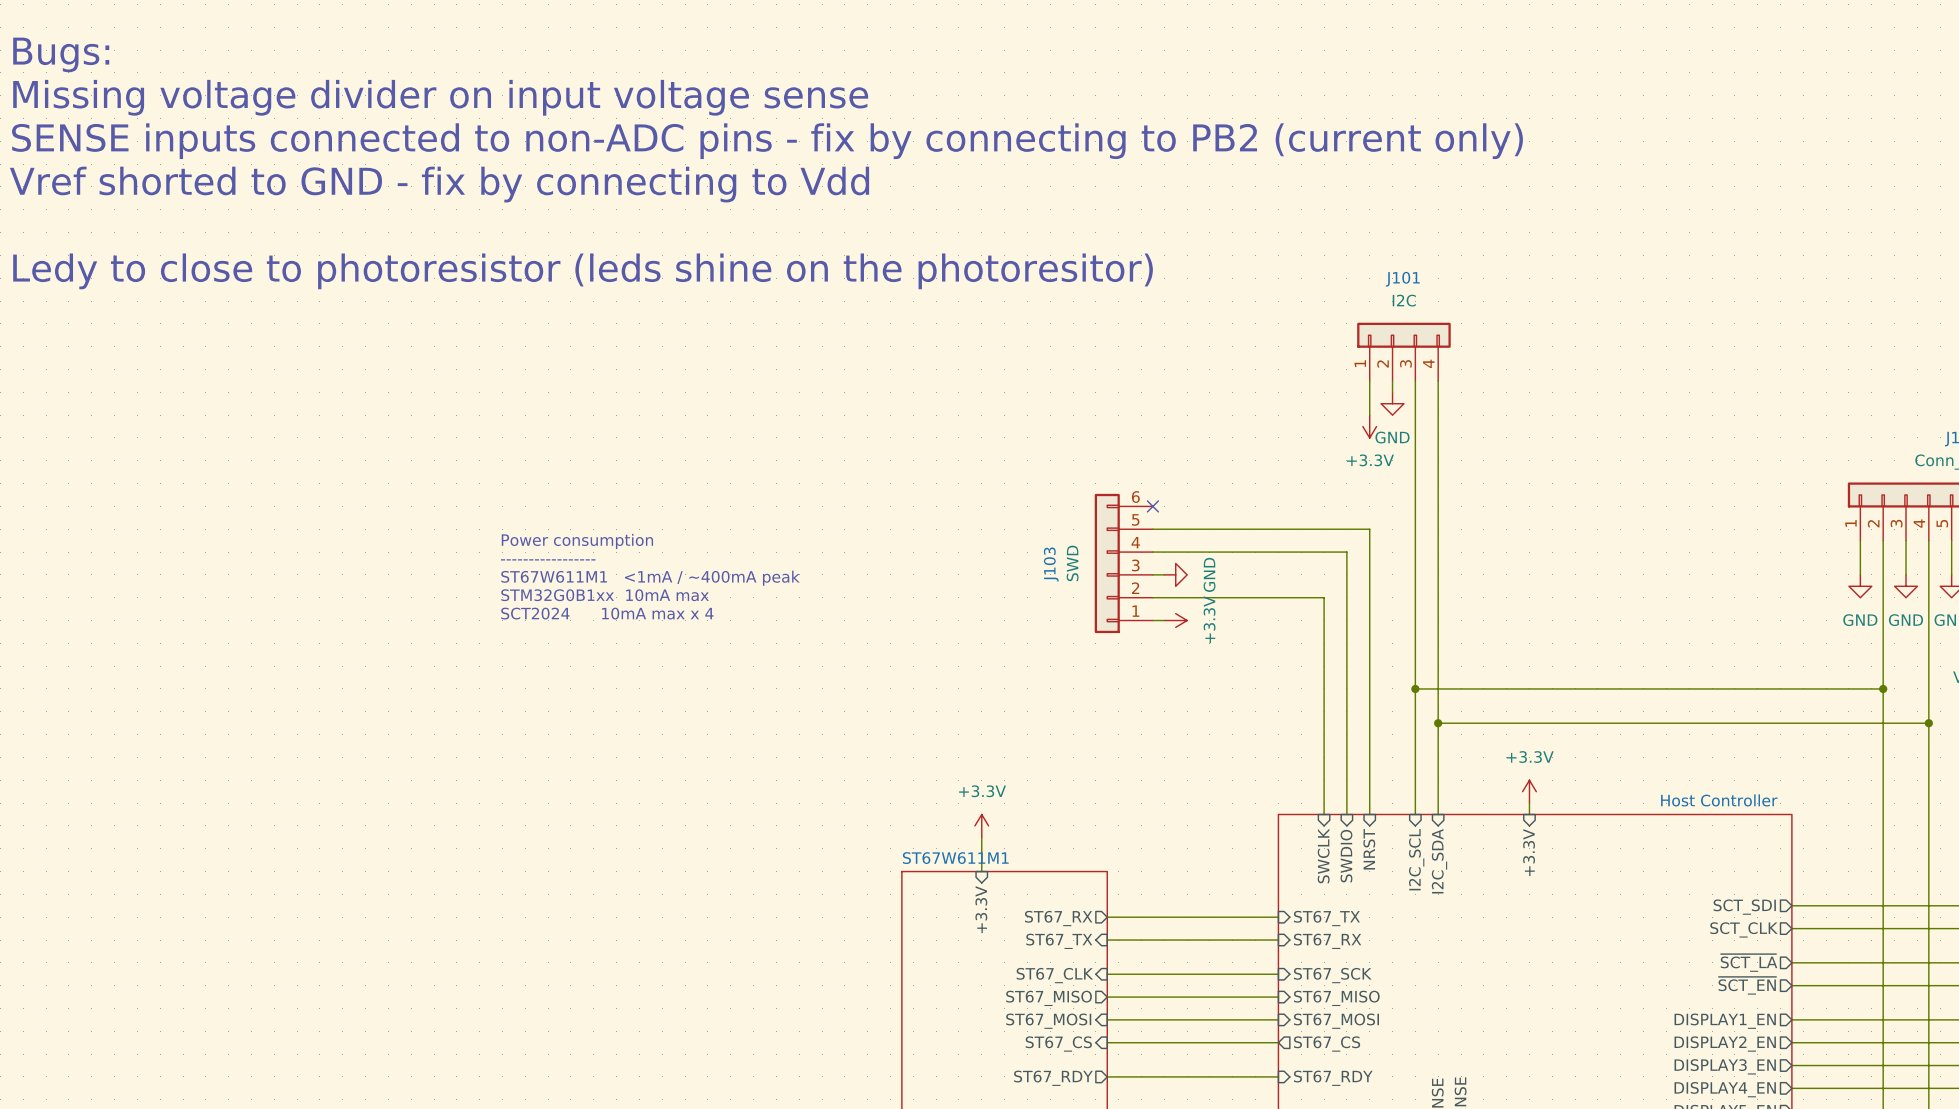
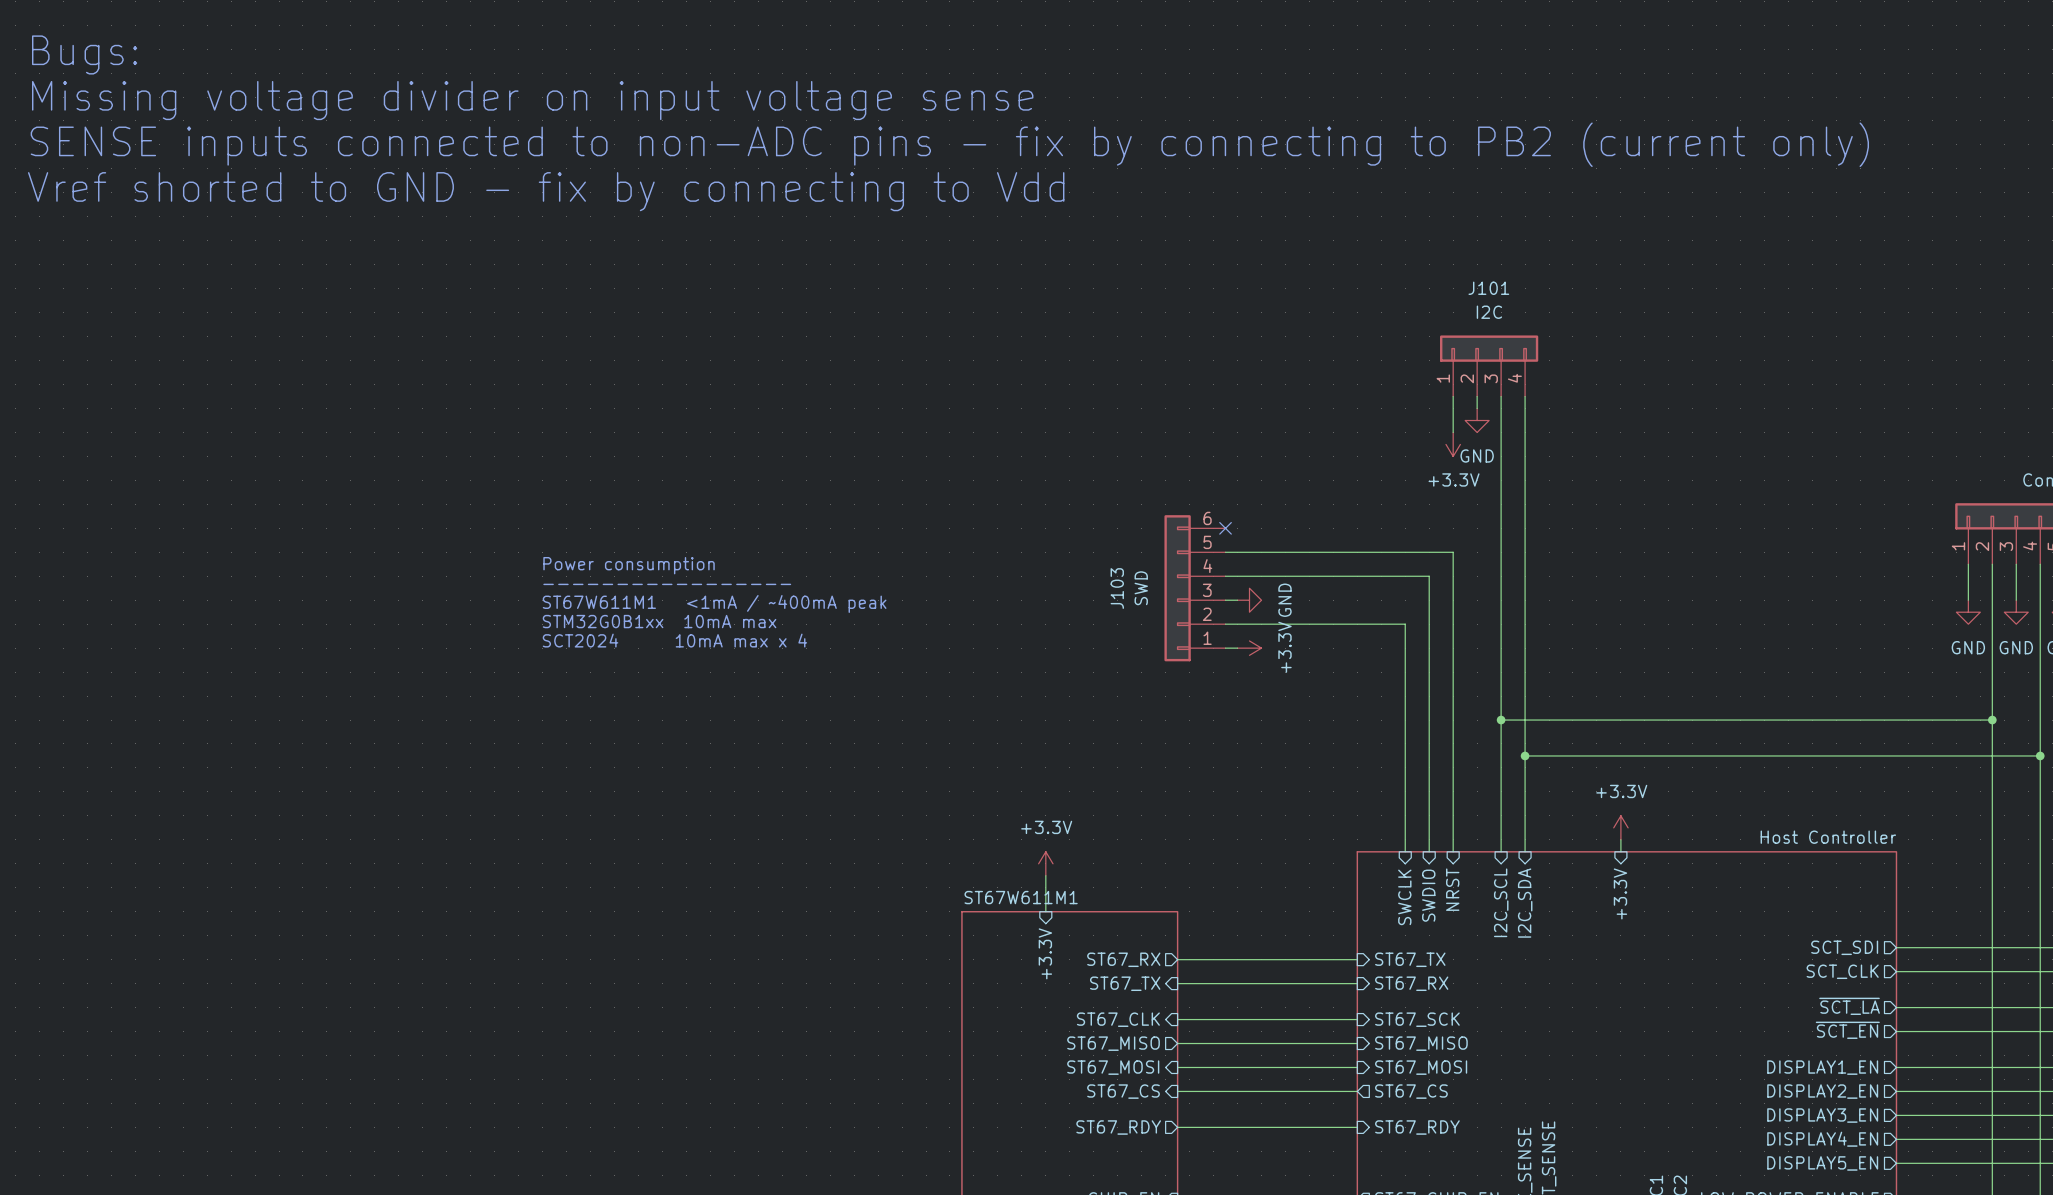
text: Ledy to close to photoresistor (leds shine on the photoresitor) (583, 271) -> none

